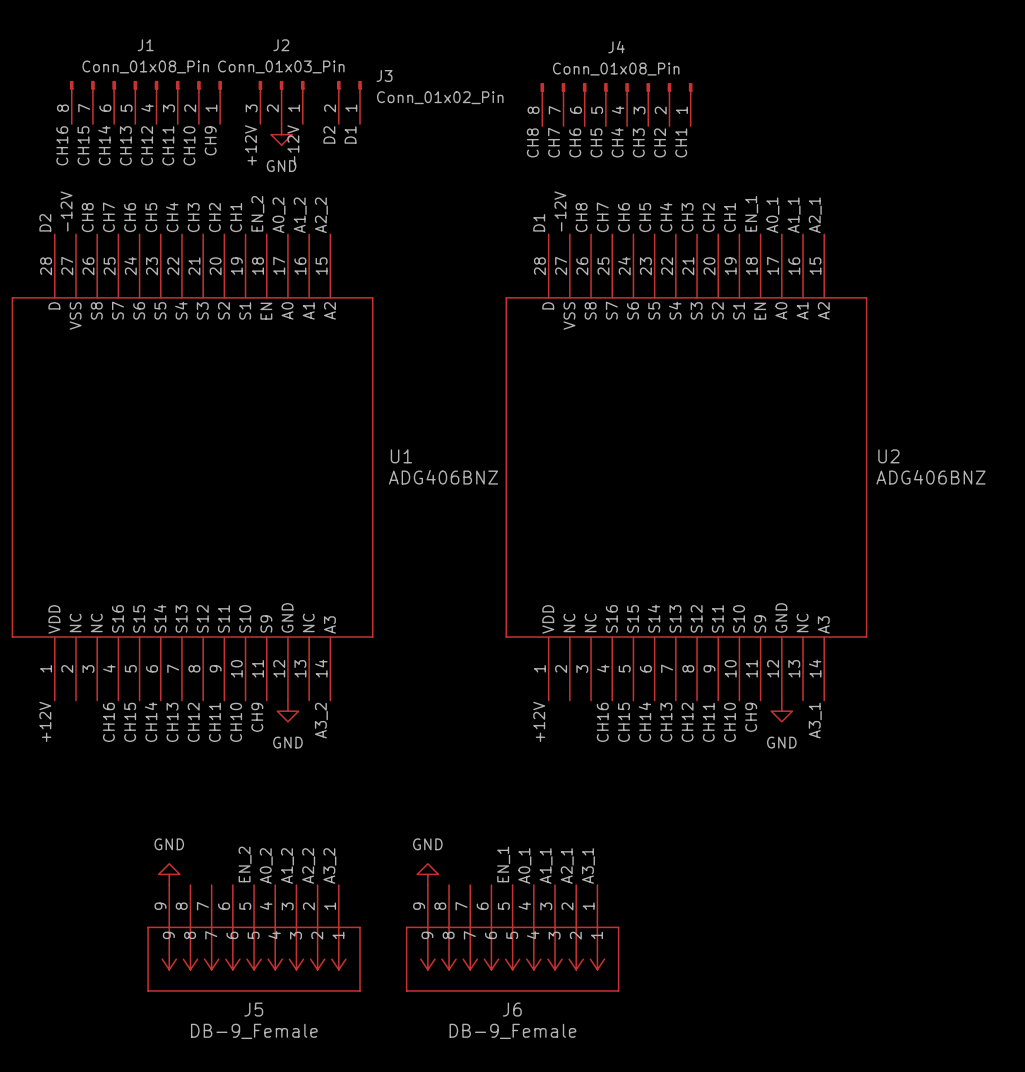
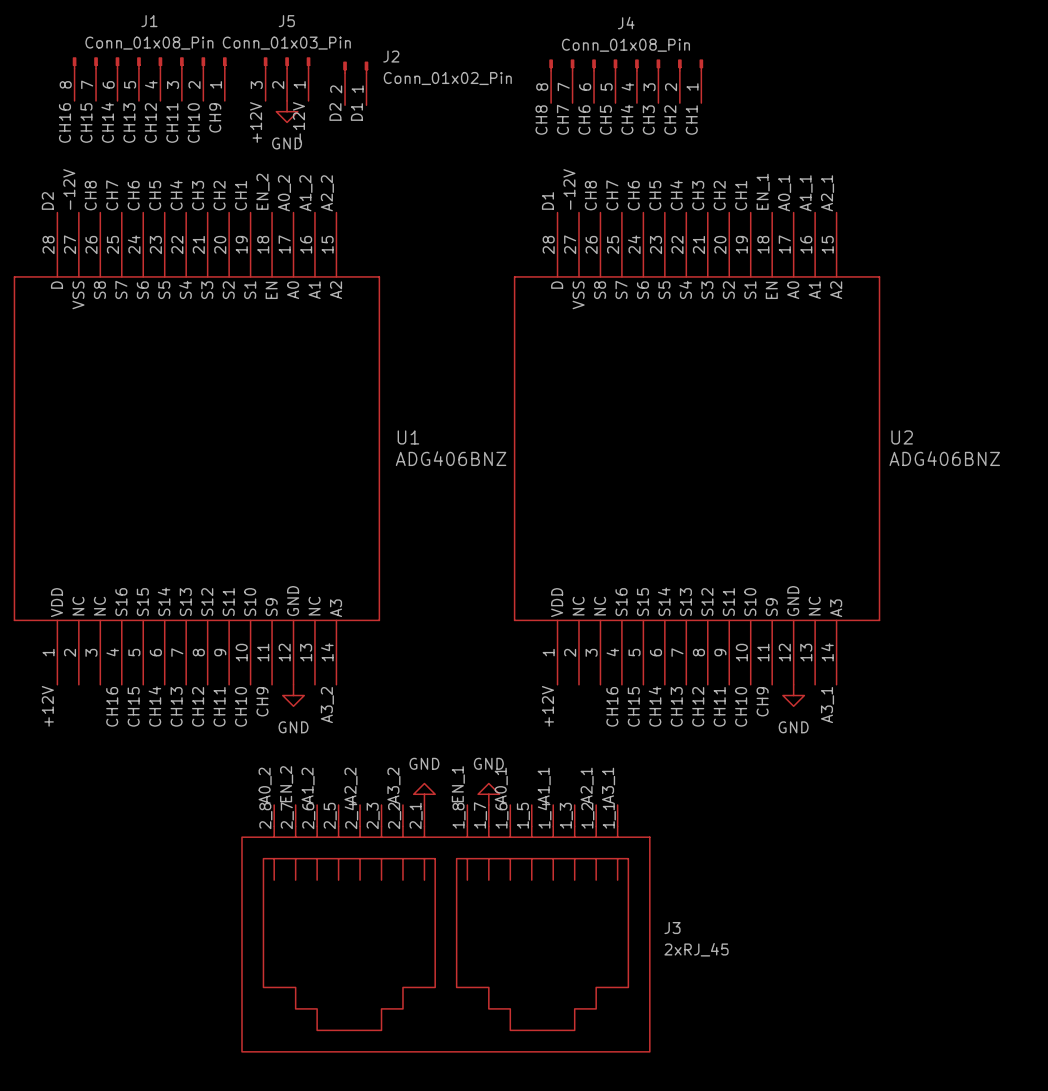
J2 name: J2 (281, 45) -> J5 (286, 21)
J3 name position: J3 (384, 75) -> J3 (672, 928)
J3 symbol: [337, 81, 362, 125] -> [241, 805, 650, 1052]
J3 value: Conn_01x02_Pin (440, 97) -> 2xRJ_45 (696, 949)
J2: none -> Conn_01x02_Pin (355, 83)
power symbol: none -> GND (424, 794)
power symbol: none -> GND (488, 794)
label position: EN_2 (245, 864) -> EN_2 (286, 784)
label position: EN_1 (503, 864) -> EN_1 (458, 784)
label position: A0_2 (266, 865) -> A0_2 (265, 785)
label position: A1_2 (287, 865) -> A1_2 (308, 785)
label position: A2_2 (308, 865) -> A2_2 (350, 785)
label position: A3_2 (329, 865) -> A3_2 (393, 785)
label position: A0_1 (524, 865) -> A0_1 (501, 785)
label position: A1_1 (546, 865) -> A1_1 (544, 785)
label position: A2_1 (567, 865) -> A2_1 (587, 785)
label position: A3_1 (588, 865) -> A3_1 (608, 785)
power symbol: GND (169, 874) -> none
power symbol: GND (427, 874) -> none
J5: DB-9_Female (254, 938) -> none
J6: DB-9_Female (512, 938) -> none

